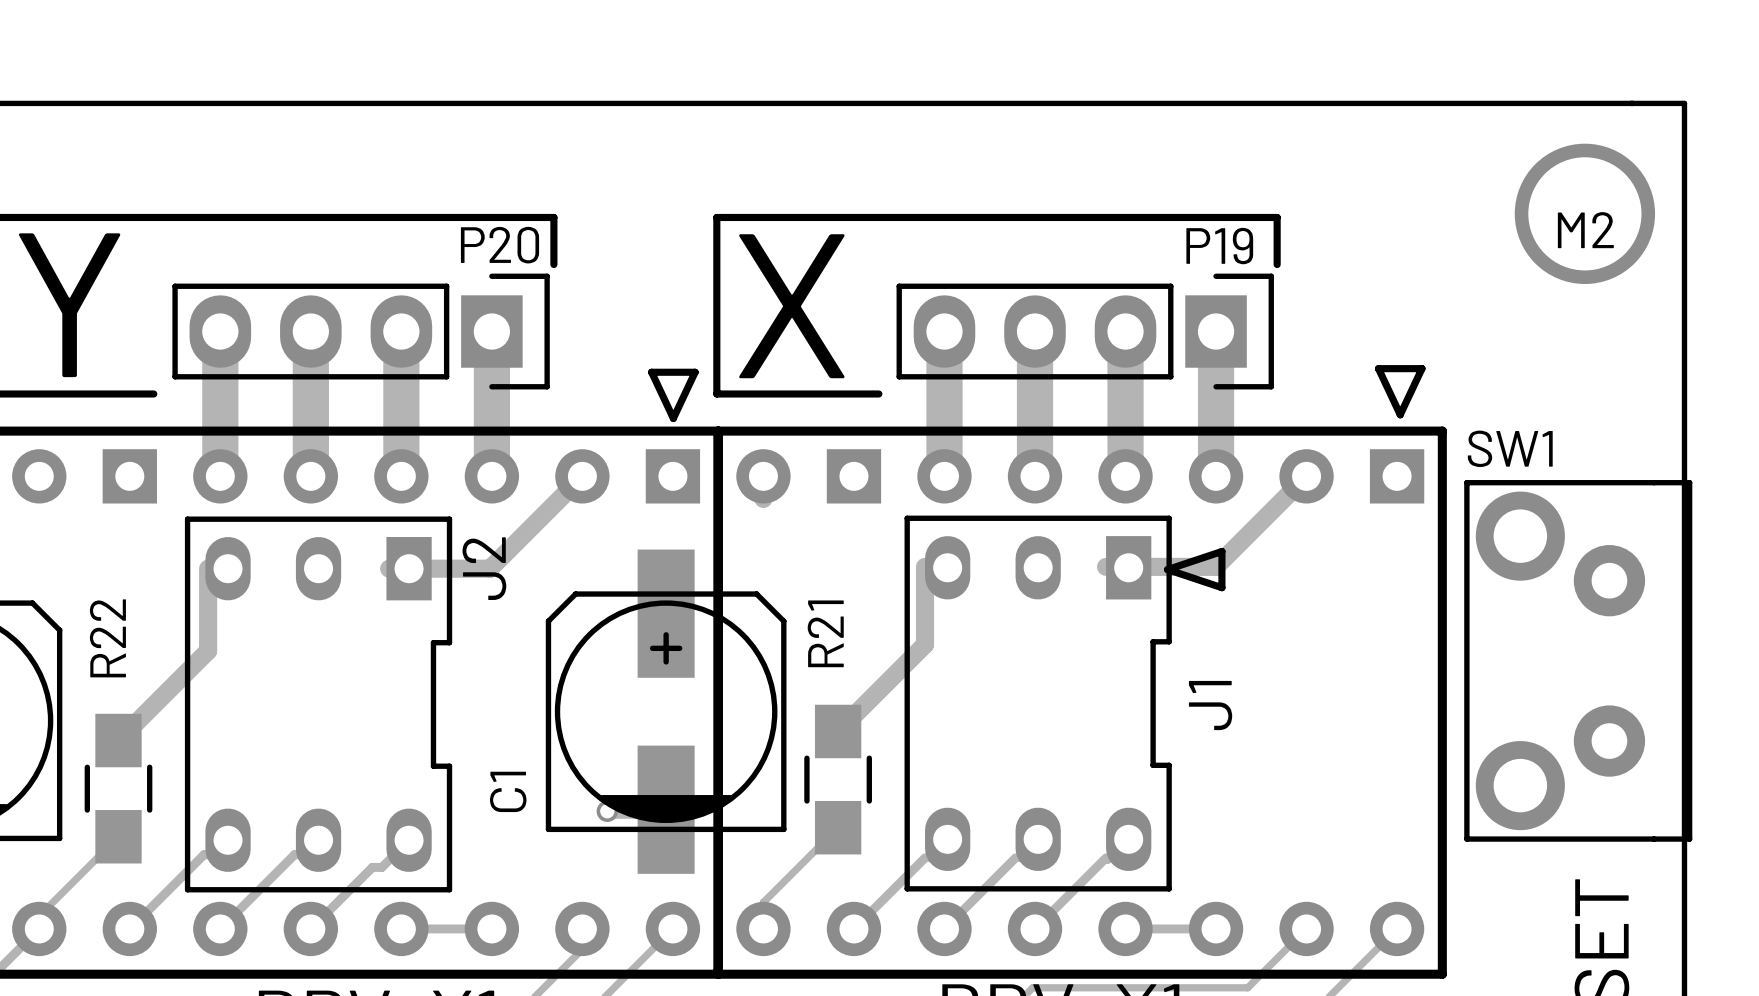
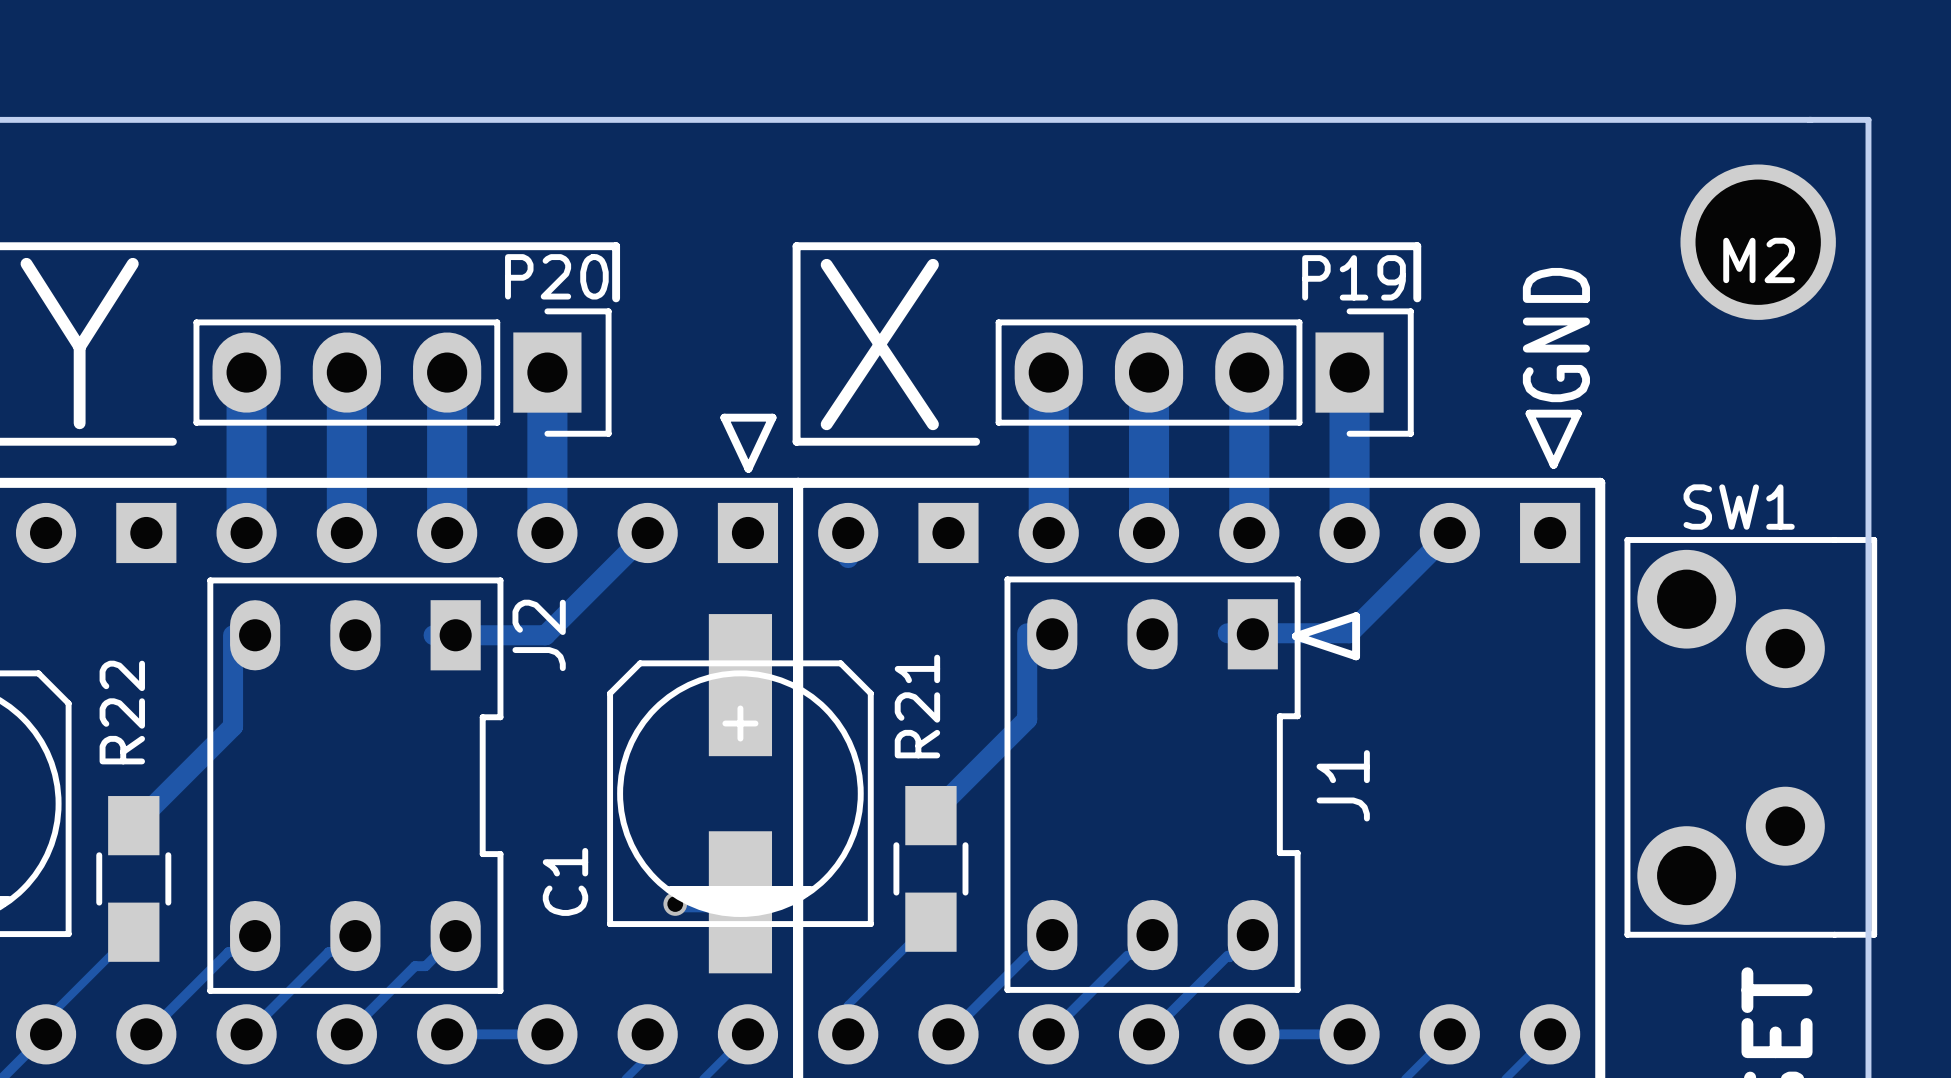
text: none -> GND (1556, 335)
SW1 name position: SW1 (1510, 448) -> SW1 (1739, 507)

